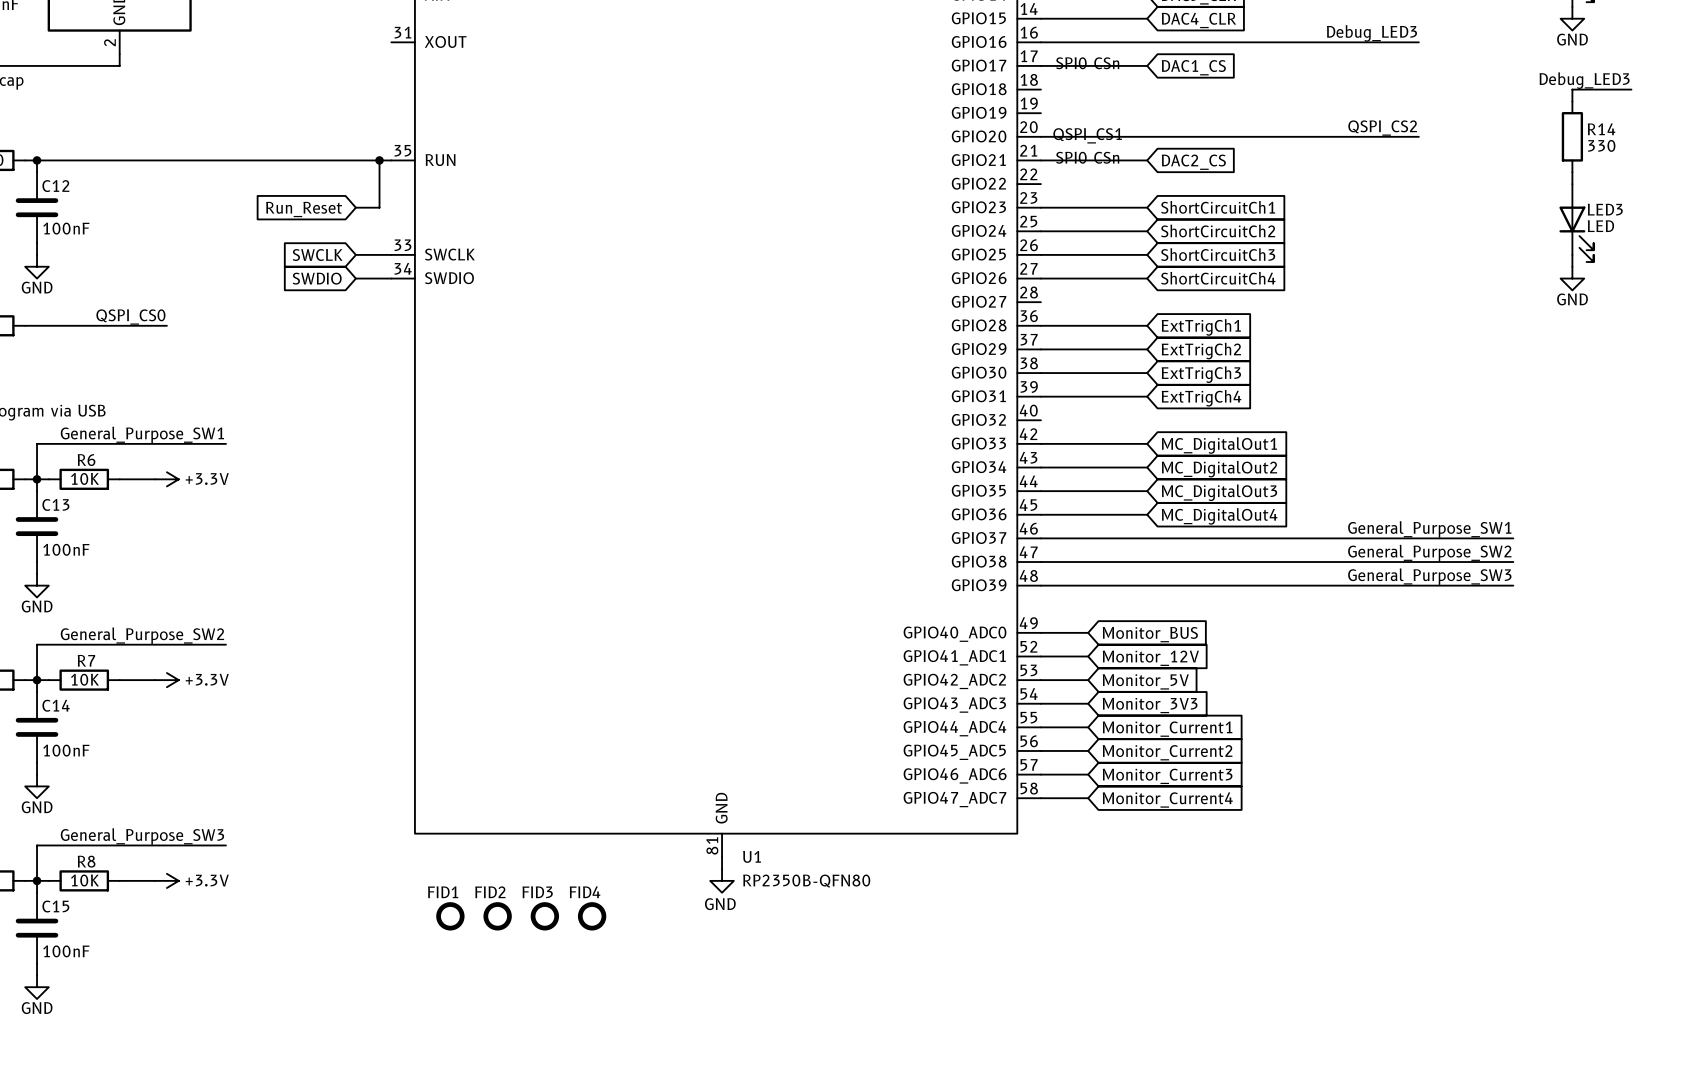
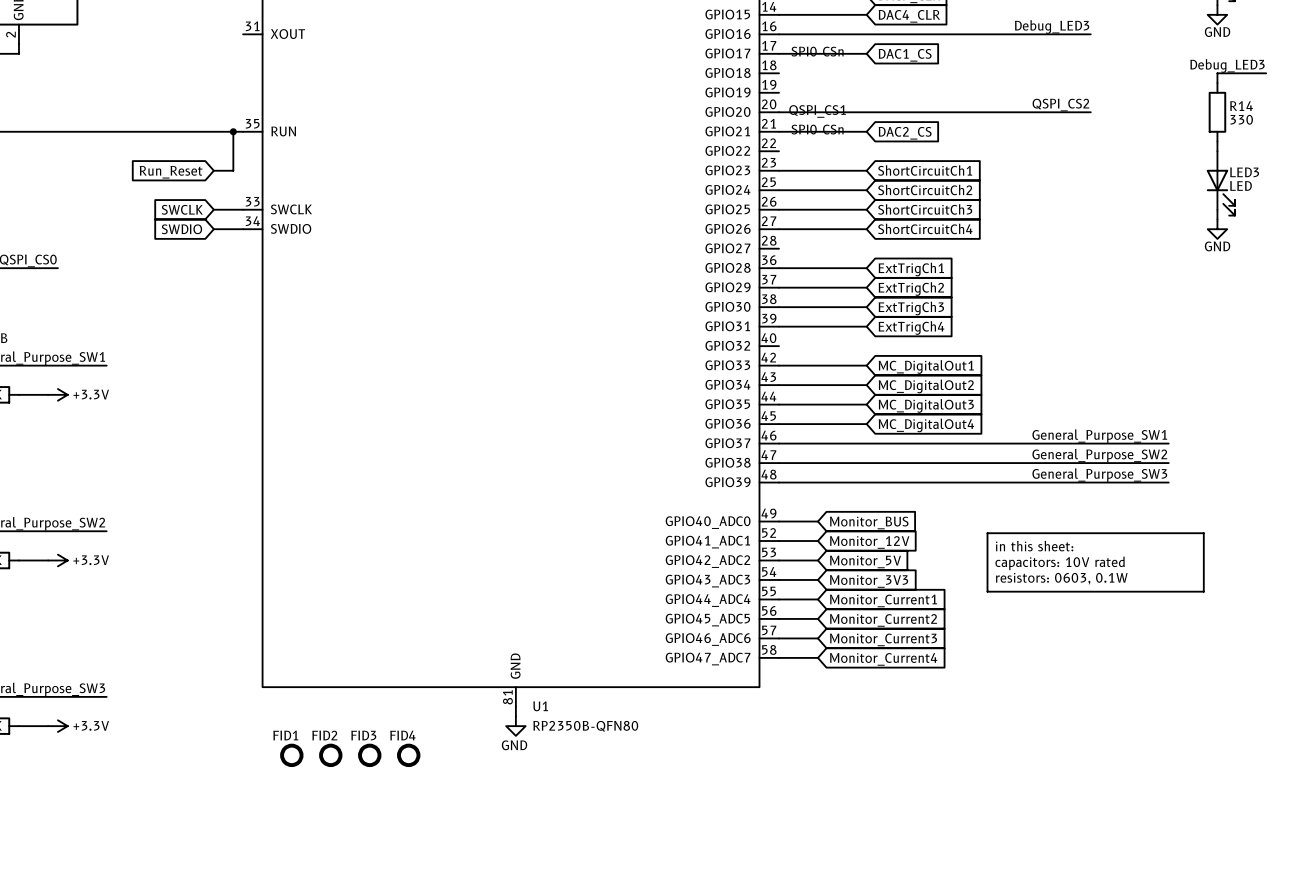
line: none -> (987, 533) (1203, 533) (1203, 591) (987, 591) (987, 533)
text: none -> in this sheet: (1034, 546)
text: none -> capacitors: 10V rated (1060, 563)
text: none -> resistors: 0603, 0.1W (1061, 578)

